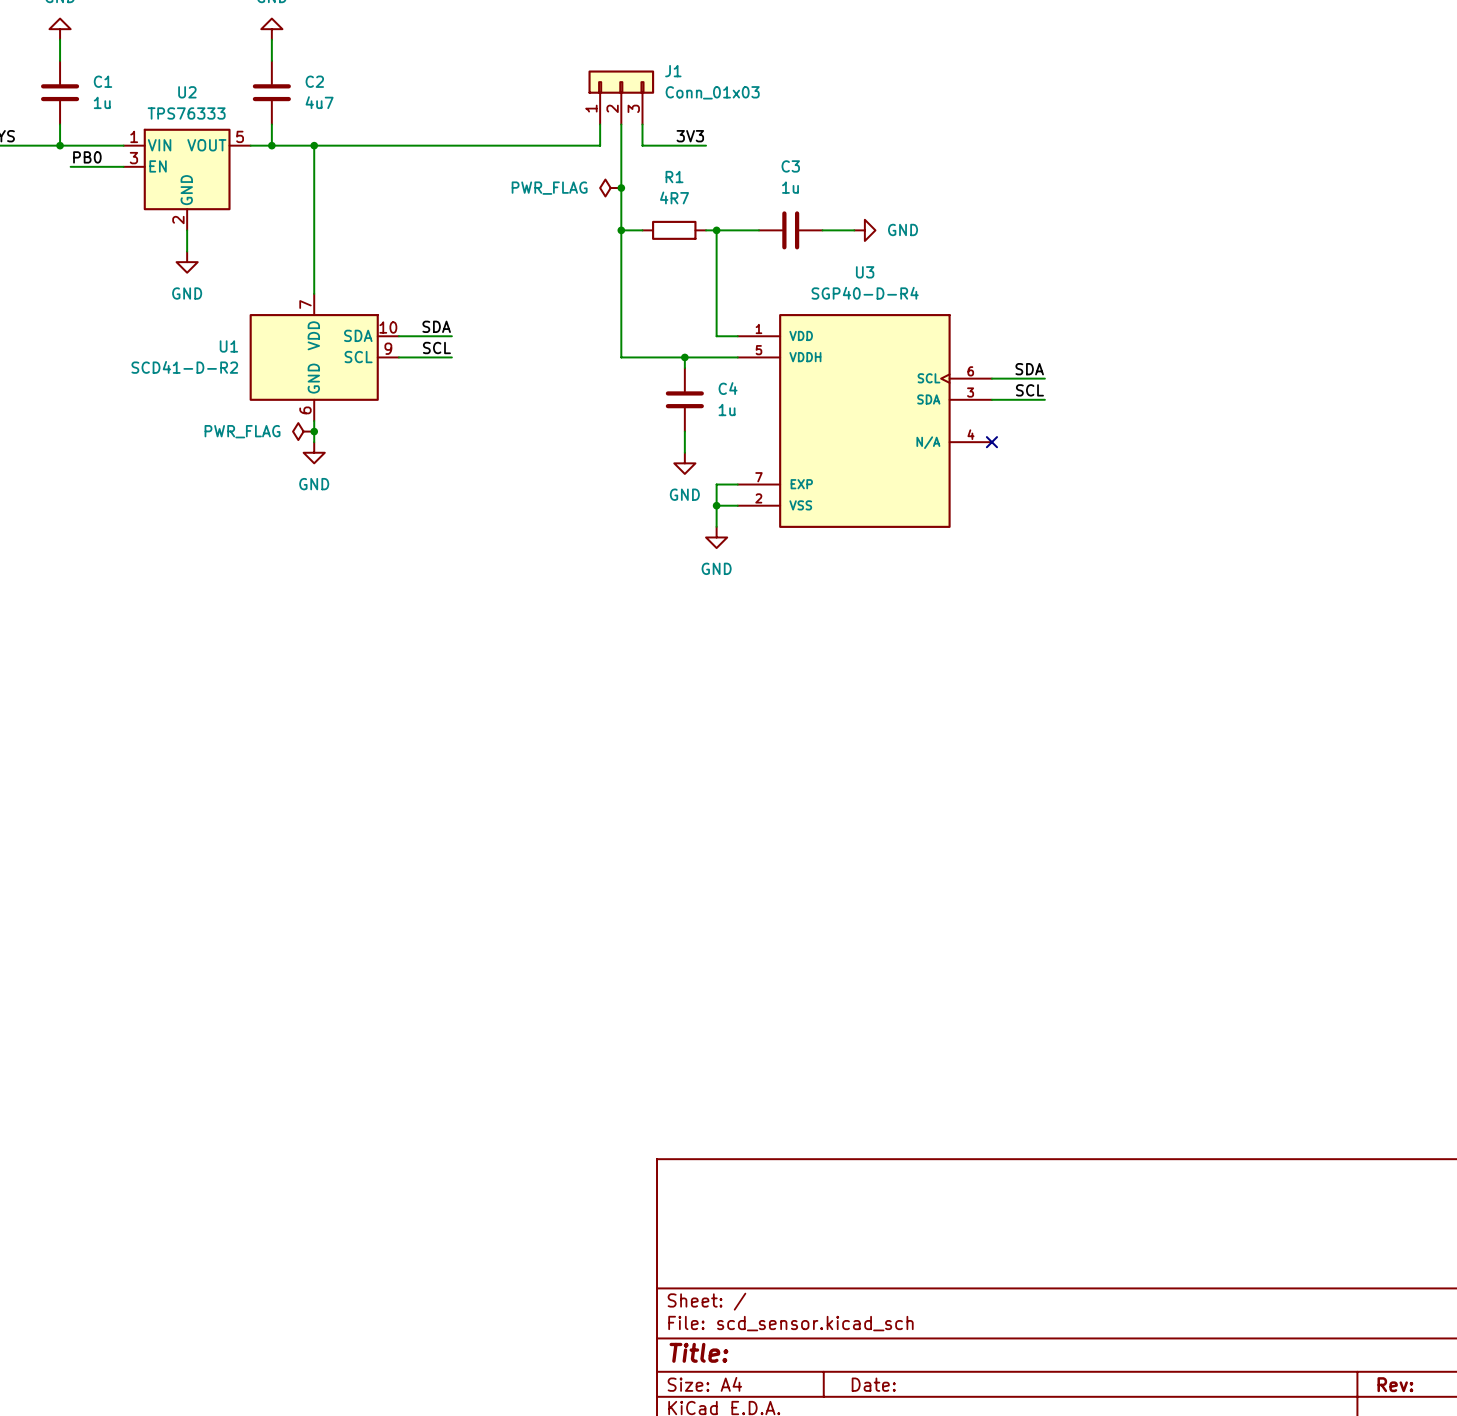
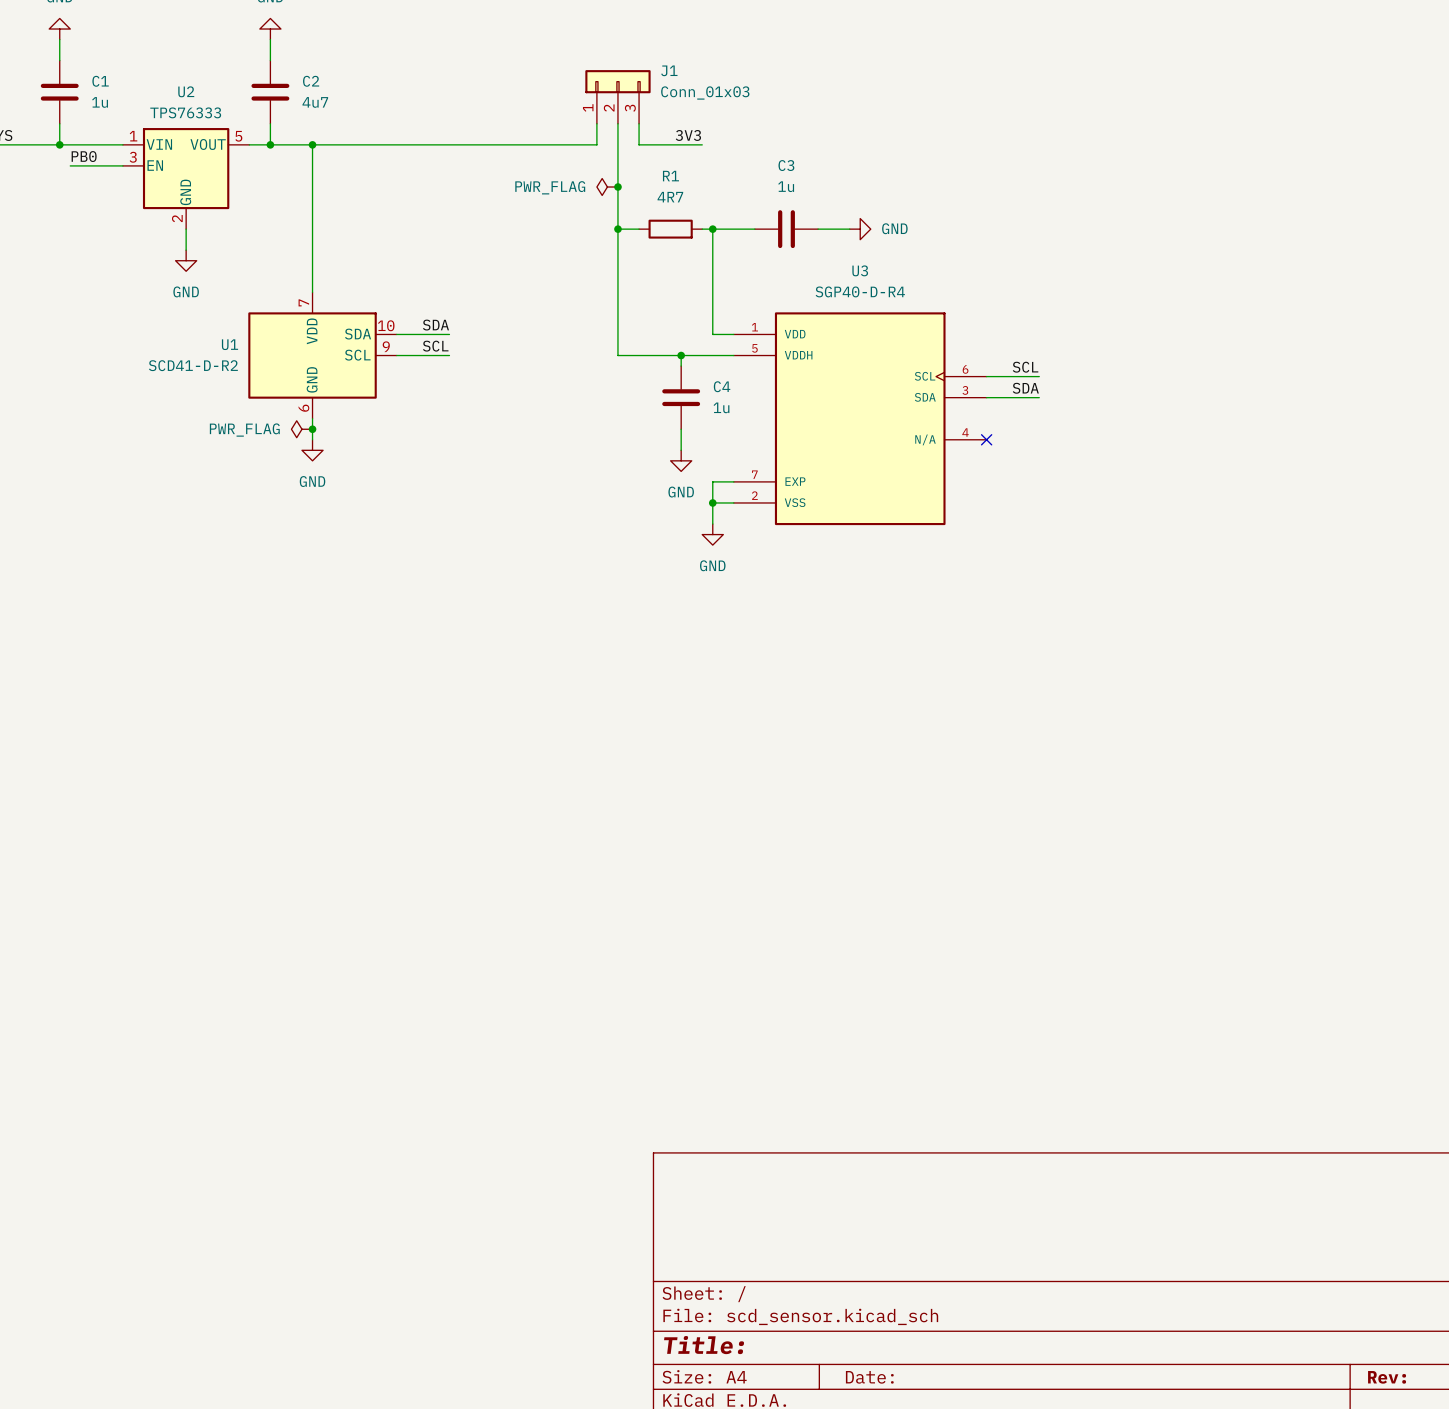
label: SDA (1029, 369) -> SCL (1025, 367)
label: SCL (1029, 390) -> SDA (1025, 388)

